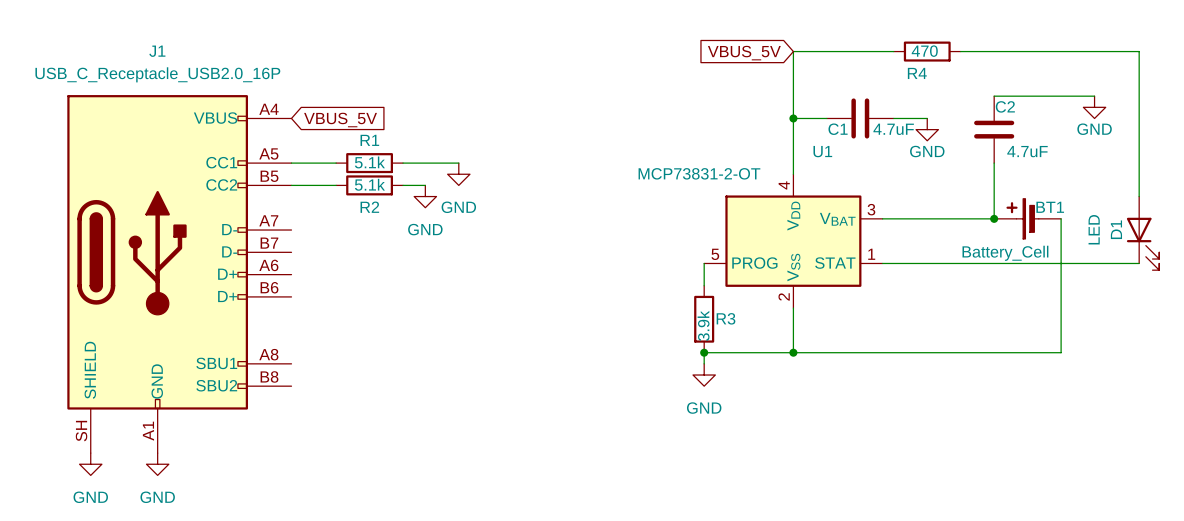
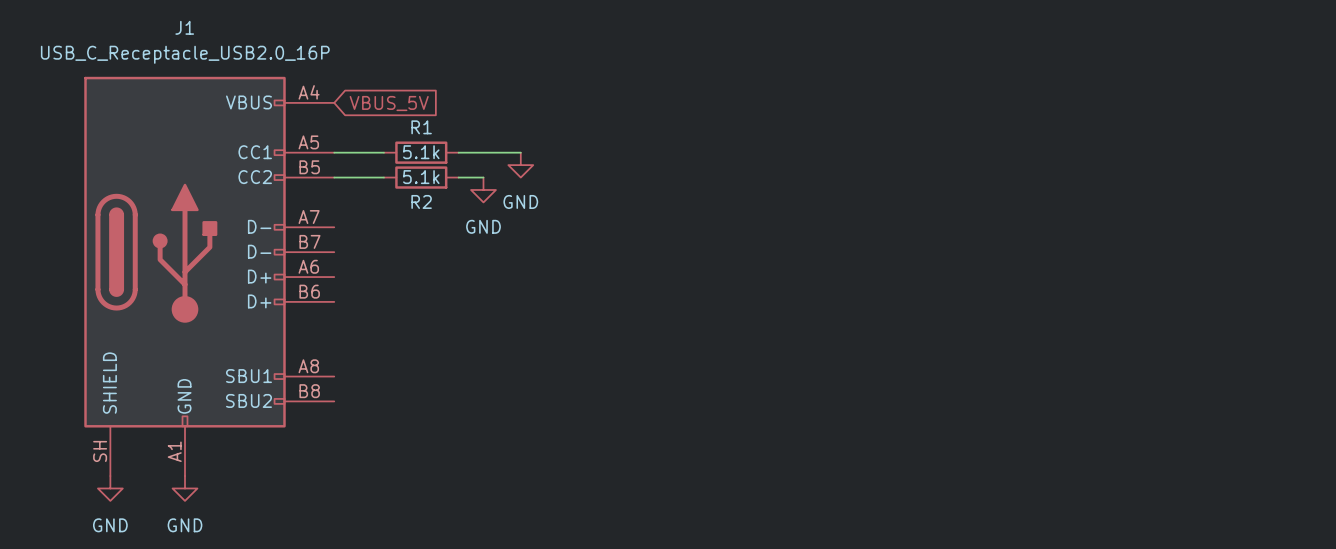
wire: (893, 51) (793, 51) (793, 174) -> none
R4: 470 (927, 51) -> none
wire: (960, 51) (1139, 51) (1139, 196) -> none
global label: VBUS_5V (744, 53) -> none
wire: (994, 96) (1094, 96) -> none
power symbol: GND (1094, 107) -> none
wire: (793, 118) (826, 118) -> none
junction: (793, 118) -> none
C1: 4.7uF (860, 118) -> none
wire: (893, 118) (927, 118) -> none
power symbol: GND (927, 129) -> none
C2: 4.7uF (994, 129) -> none
wire: (994, 163) (994, 218) (882, 218) -> none
junction: (994, 218) -> none
BT1: Battery_Cell (1027, 218) -> none
wire: (1061, 218) (1061, 352) (704, 352) (704, 363) -> none
D1: LED (1143, 233) -> none
U1: MCP73831-2-OT (793, 241) -> none
wire: (704, 263) (704, 285) -> none
wire: (882, 263) (1139, 263) -> none
wire: (793, 308) (793, 352) -> none
R3: 3.9k (704, 319) -> none
junction: (704, 352) -> none
junction: (793, 352) -> none
power symbol: GND (704, 375) -> none

